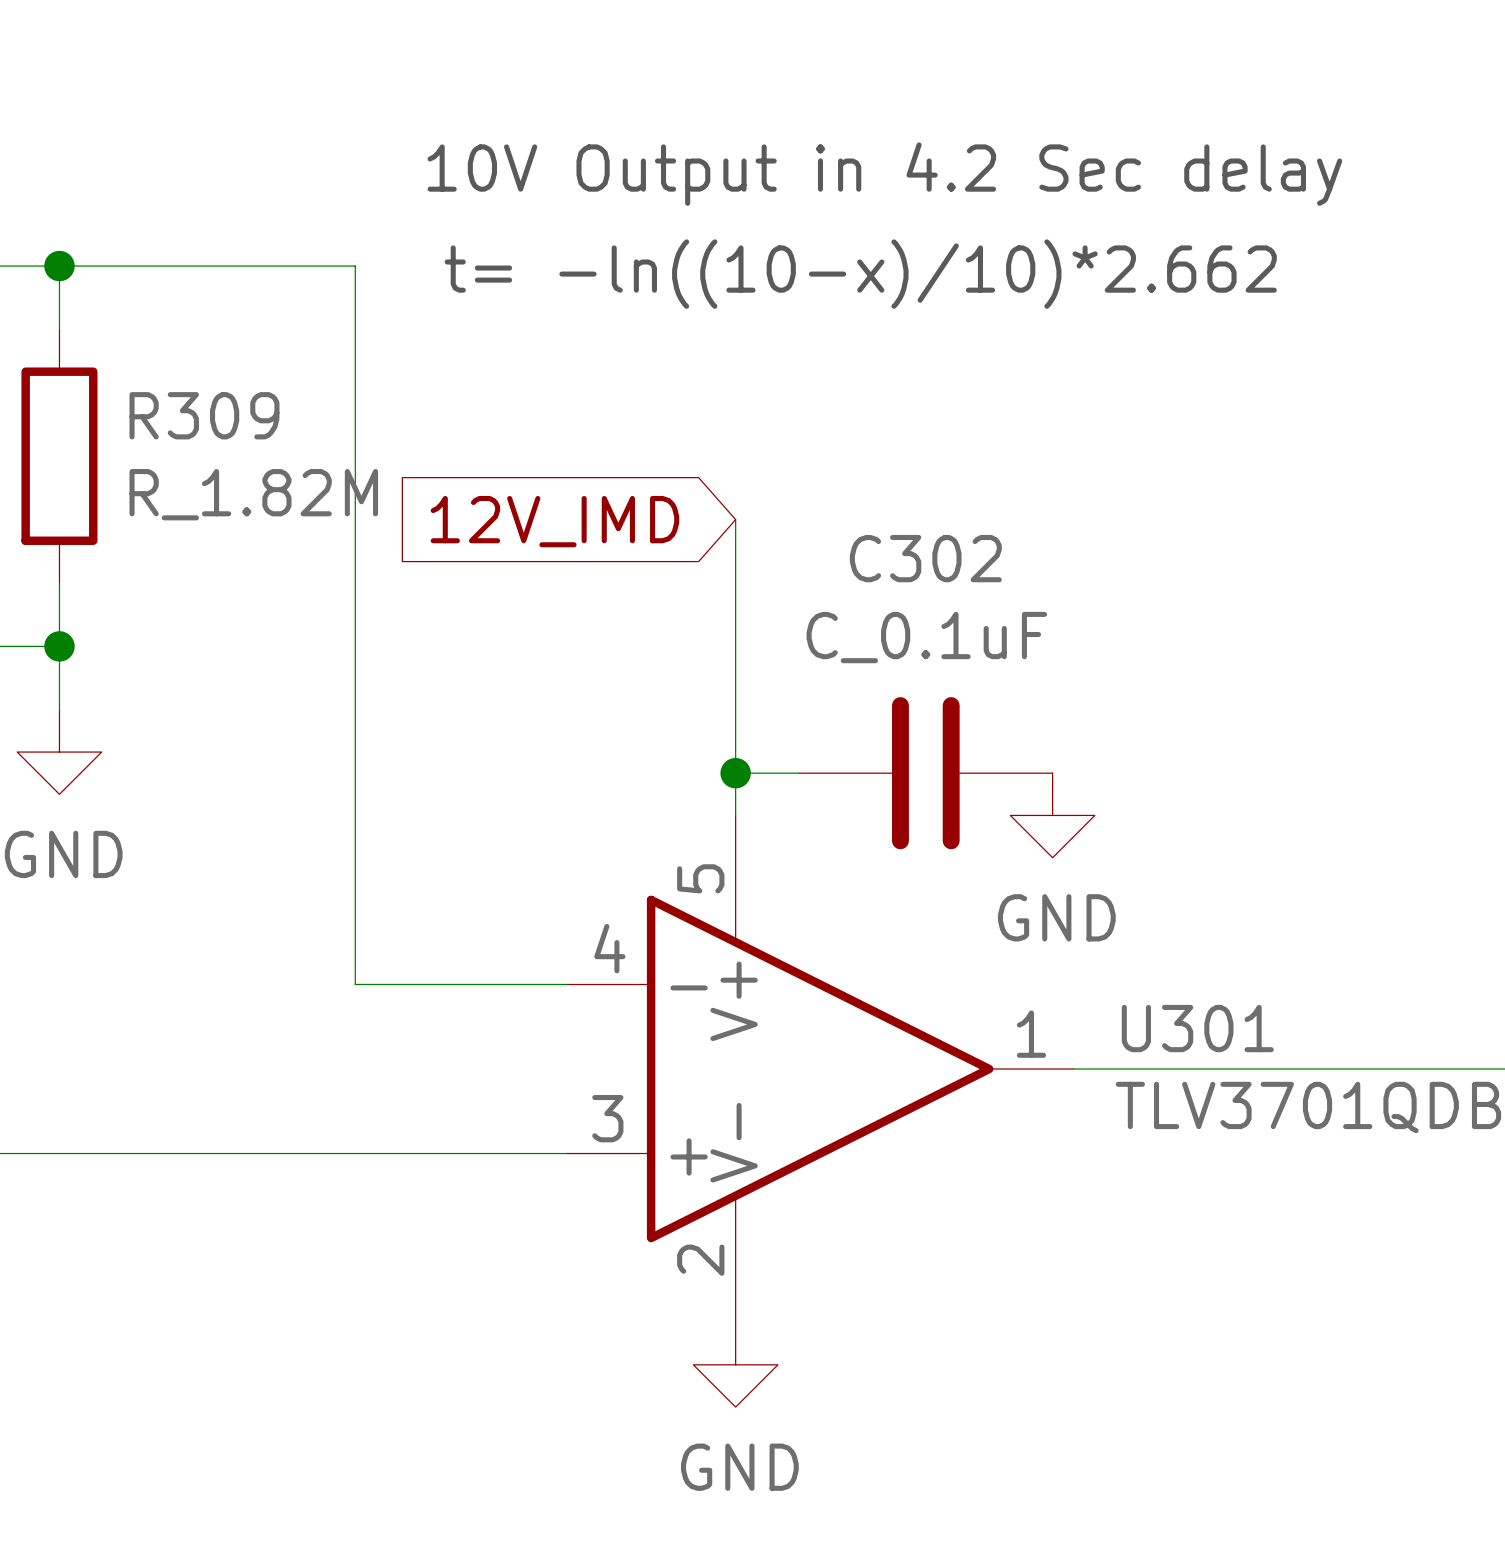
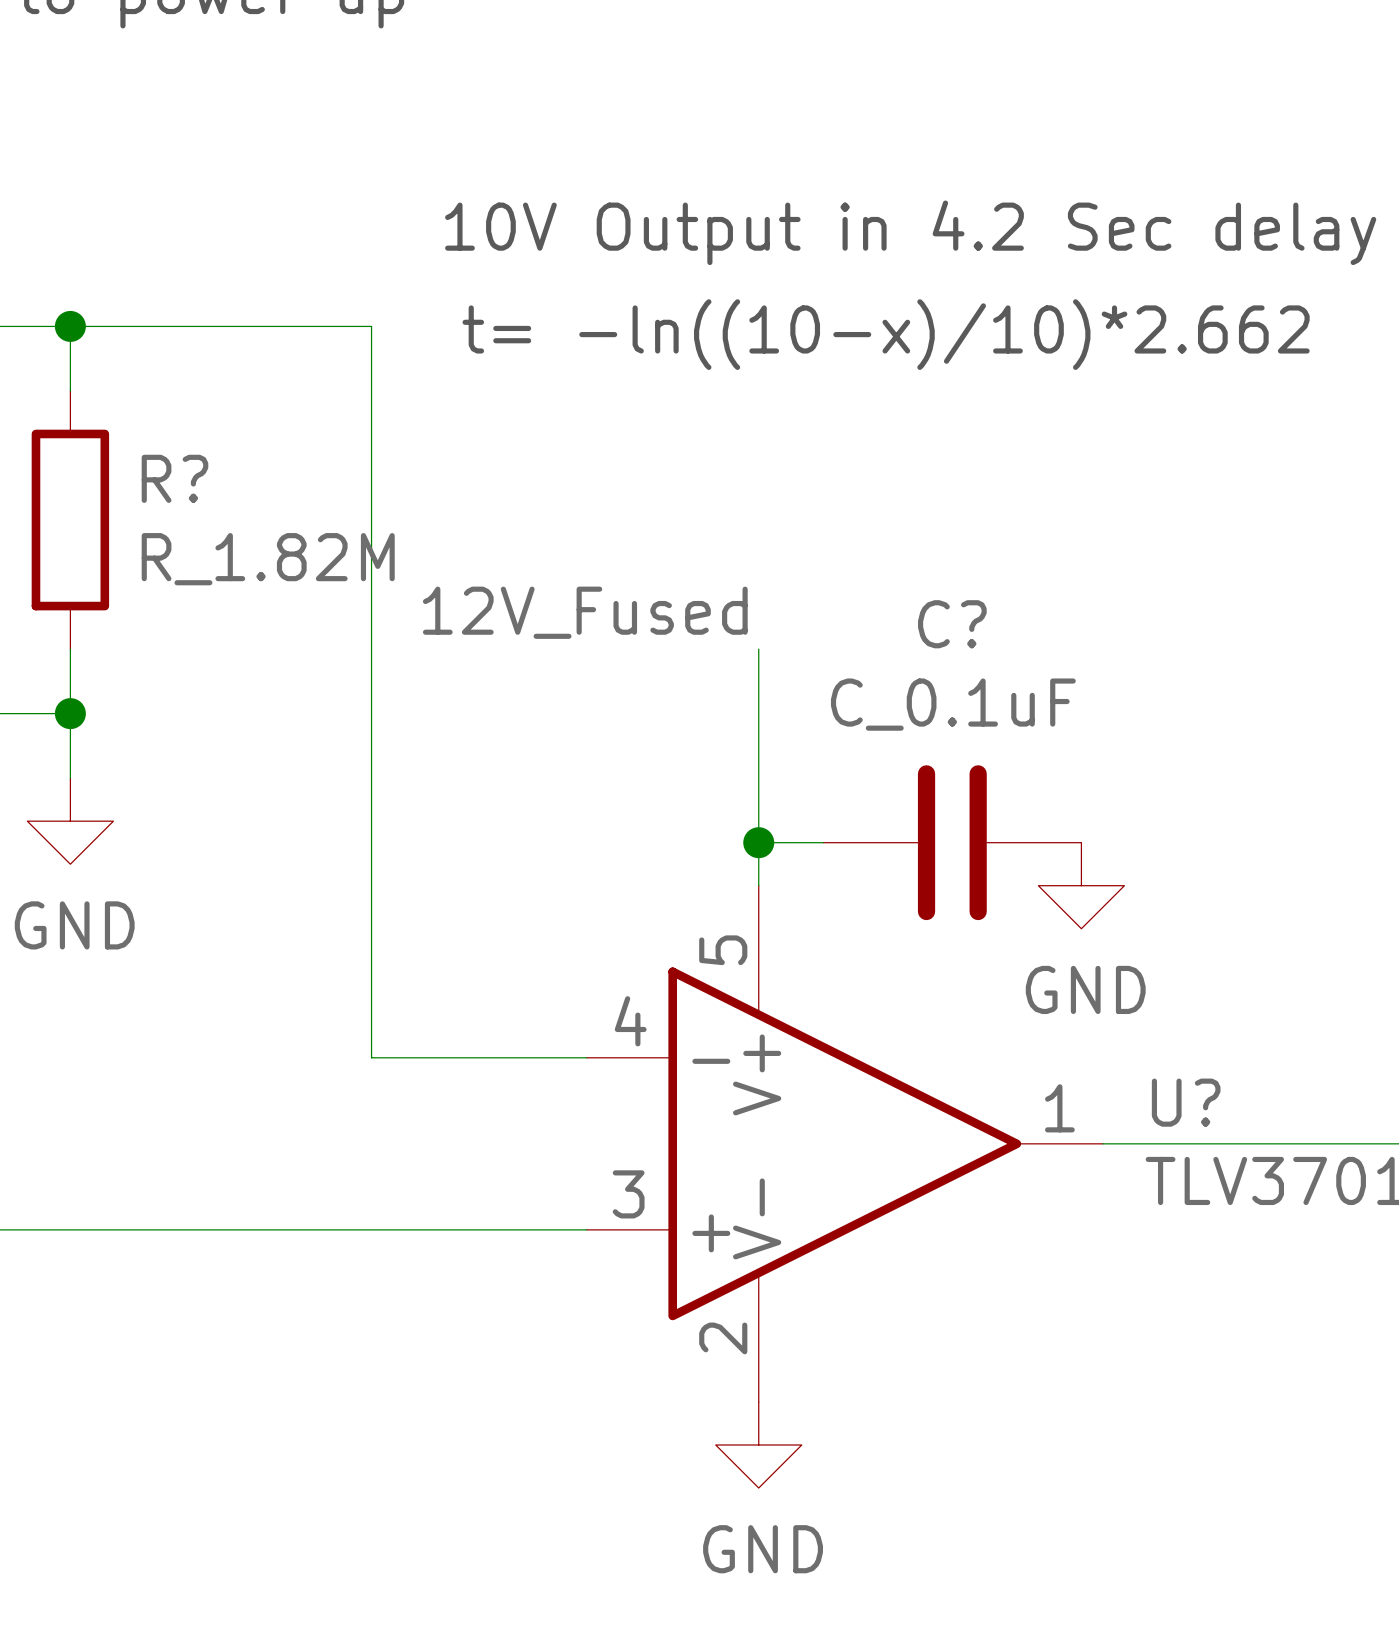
R309 name: R309 (204, 415) -> R? (174, 478)
wire: (735, 519) (735, 583) -> none
global label: 12V_IMD (554, 521) -> none
label: none -> 12V_Fused (585, 612)
C302 name: C302 (925, 558) -> C? (952, 624)
U301 name: U301 (1197, 1028) -> U? (1186, 1102)

